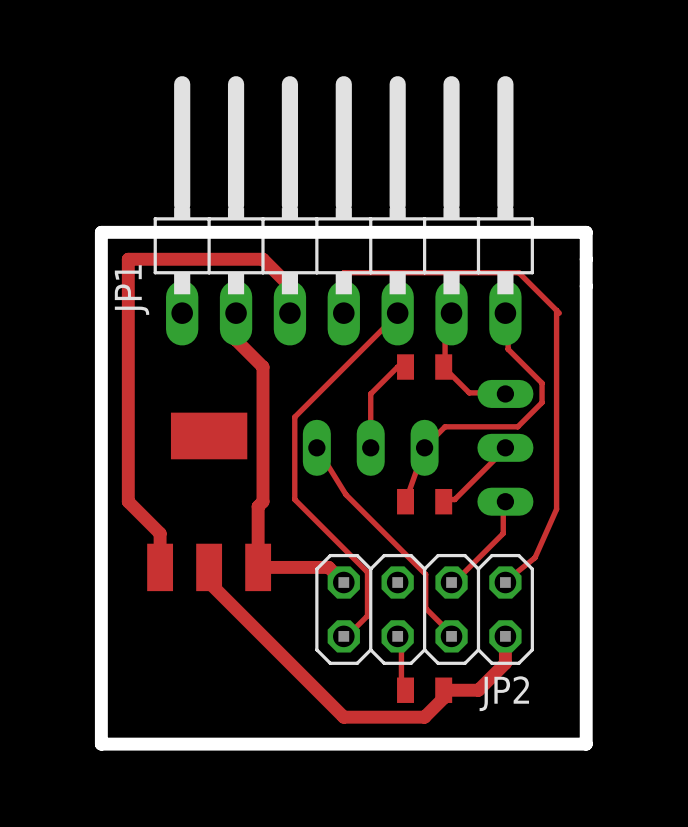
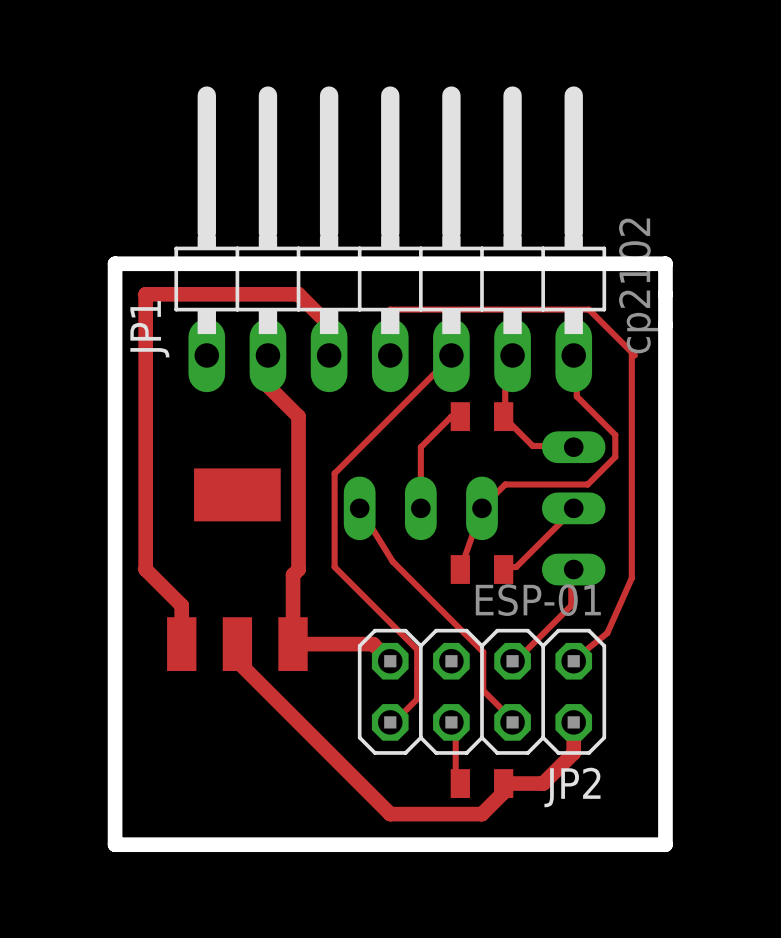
JP1 value: none -> cp2102 (638, 285)
JP2 value: none -> ESP-01 (538, 600)

